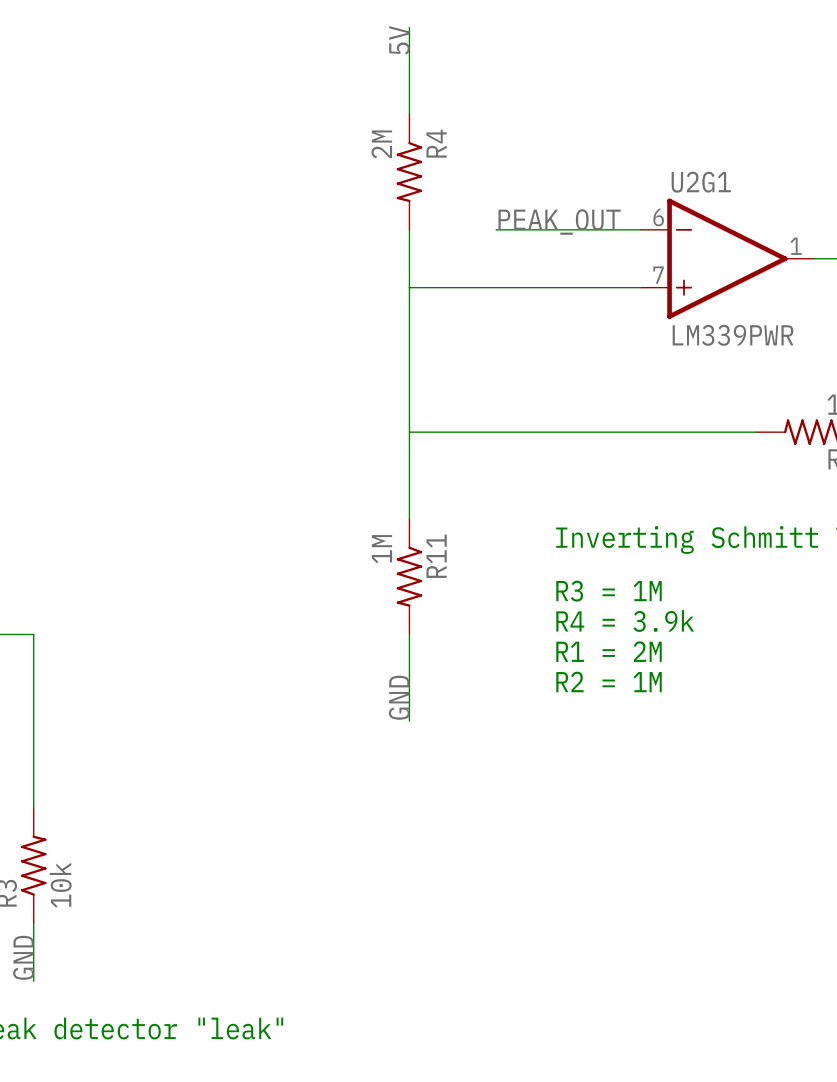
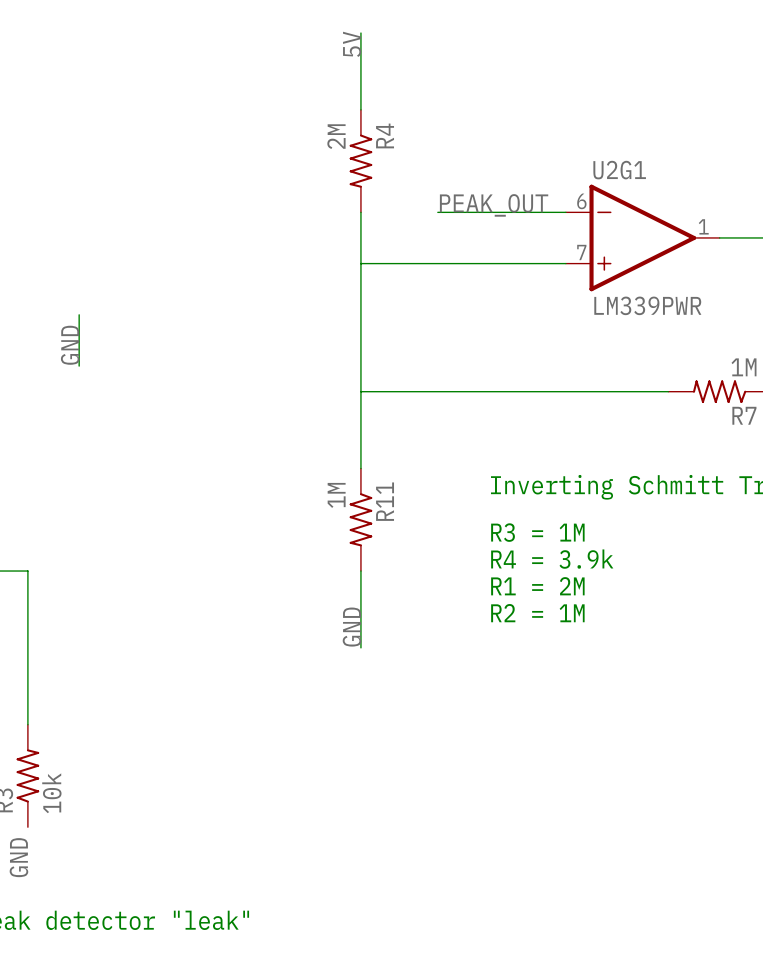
wire: none -> (79, 314) (79, 366)
label: none -> GND (70, 345)
wire: (33, 923) (33, 981) -> none

